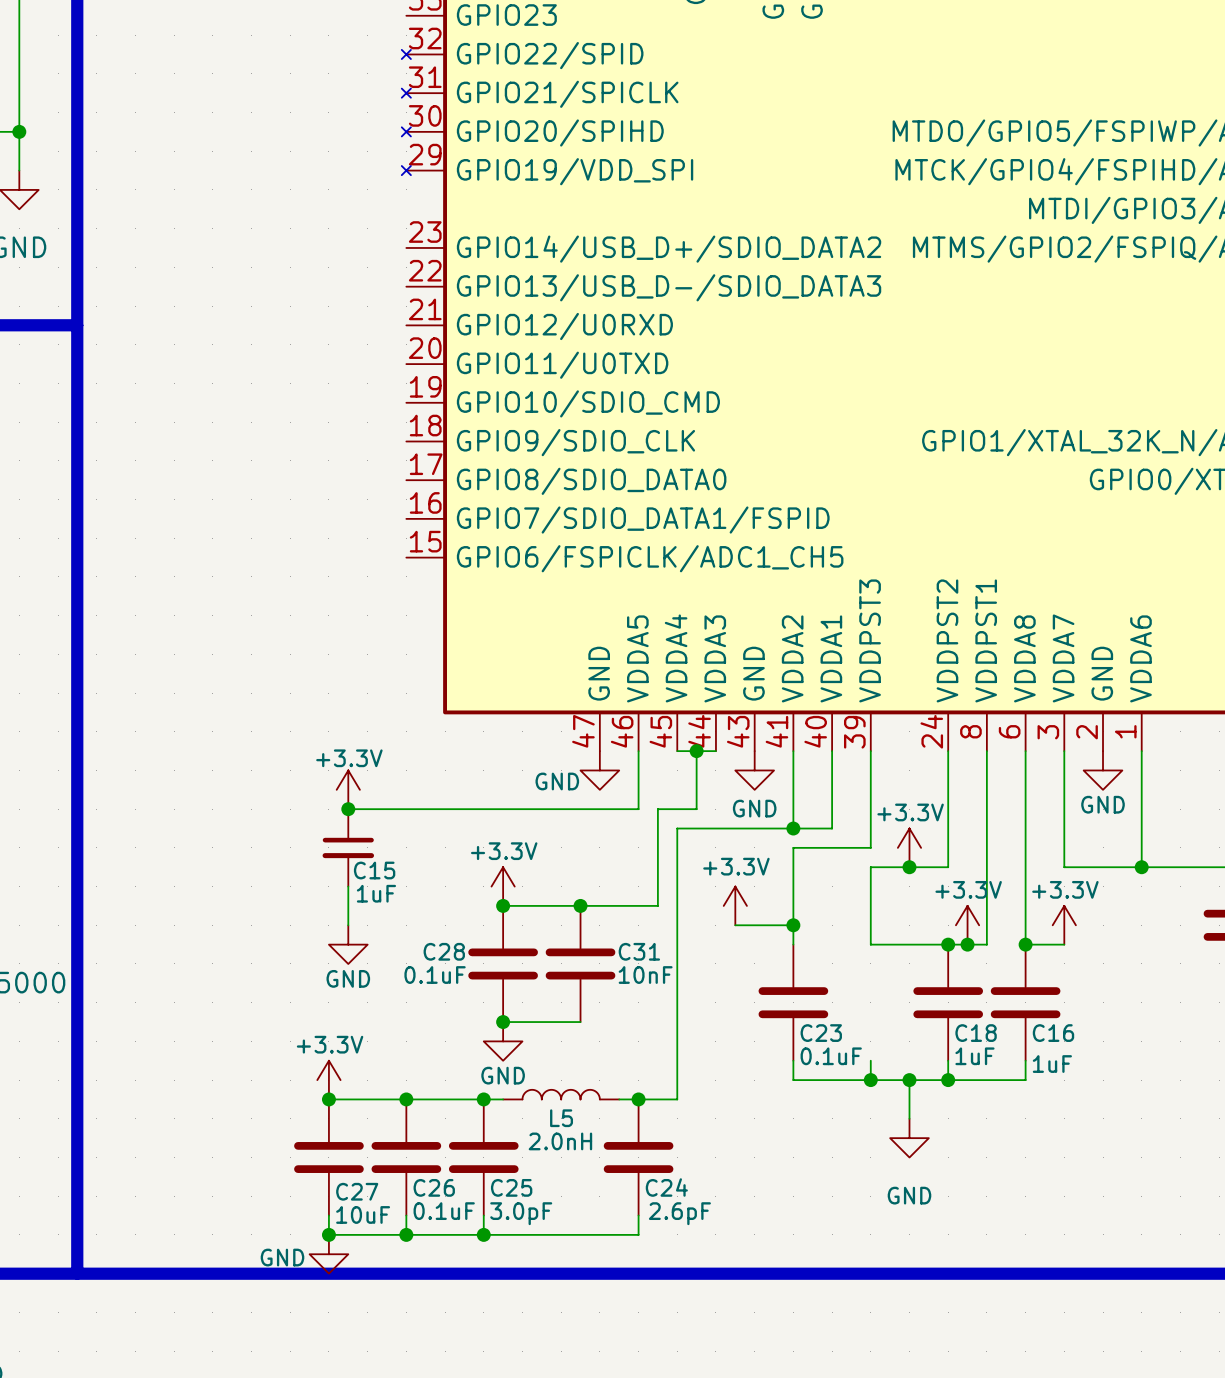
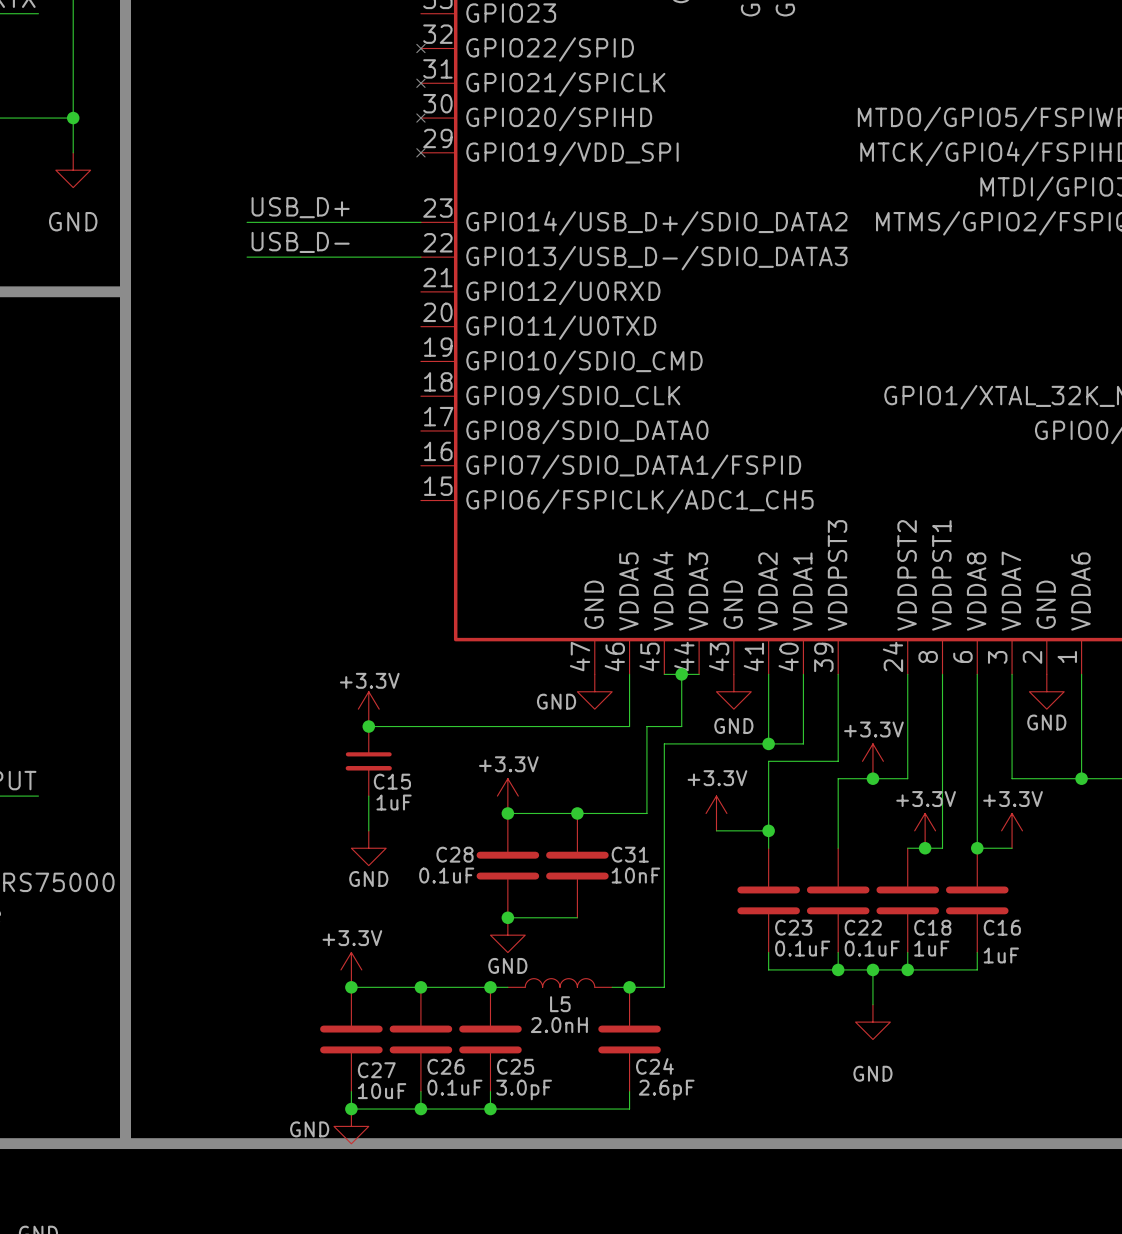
label: none -> USB_D+ (300, 207)
wire: none -> (247, 222) (420, 222)
label: none -> USB_D- (300, 242)
wire: none -> (247, 257) (420, 257)
wire: (870, 944) (948, 944) -> none
junction: (948, 944) -> none
C22: none -> 0.1uF (838, 900)

